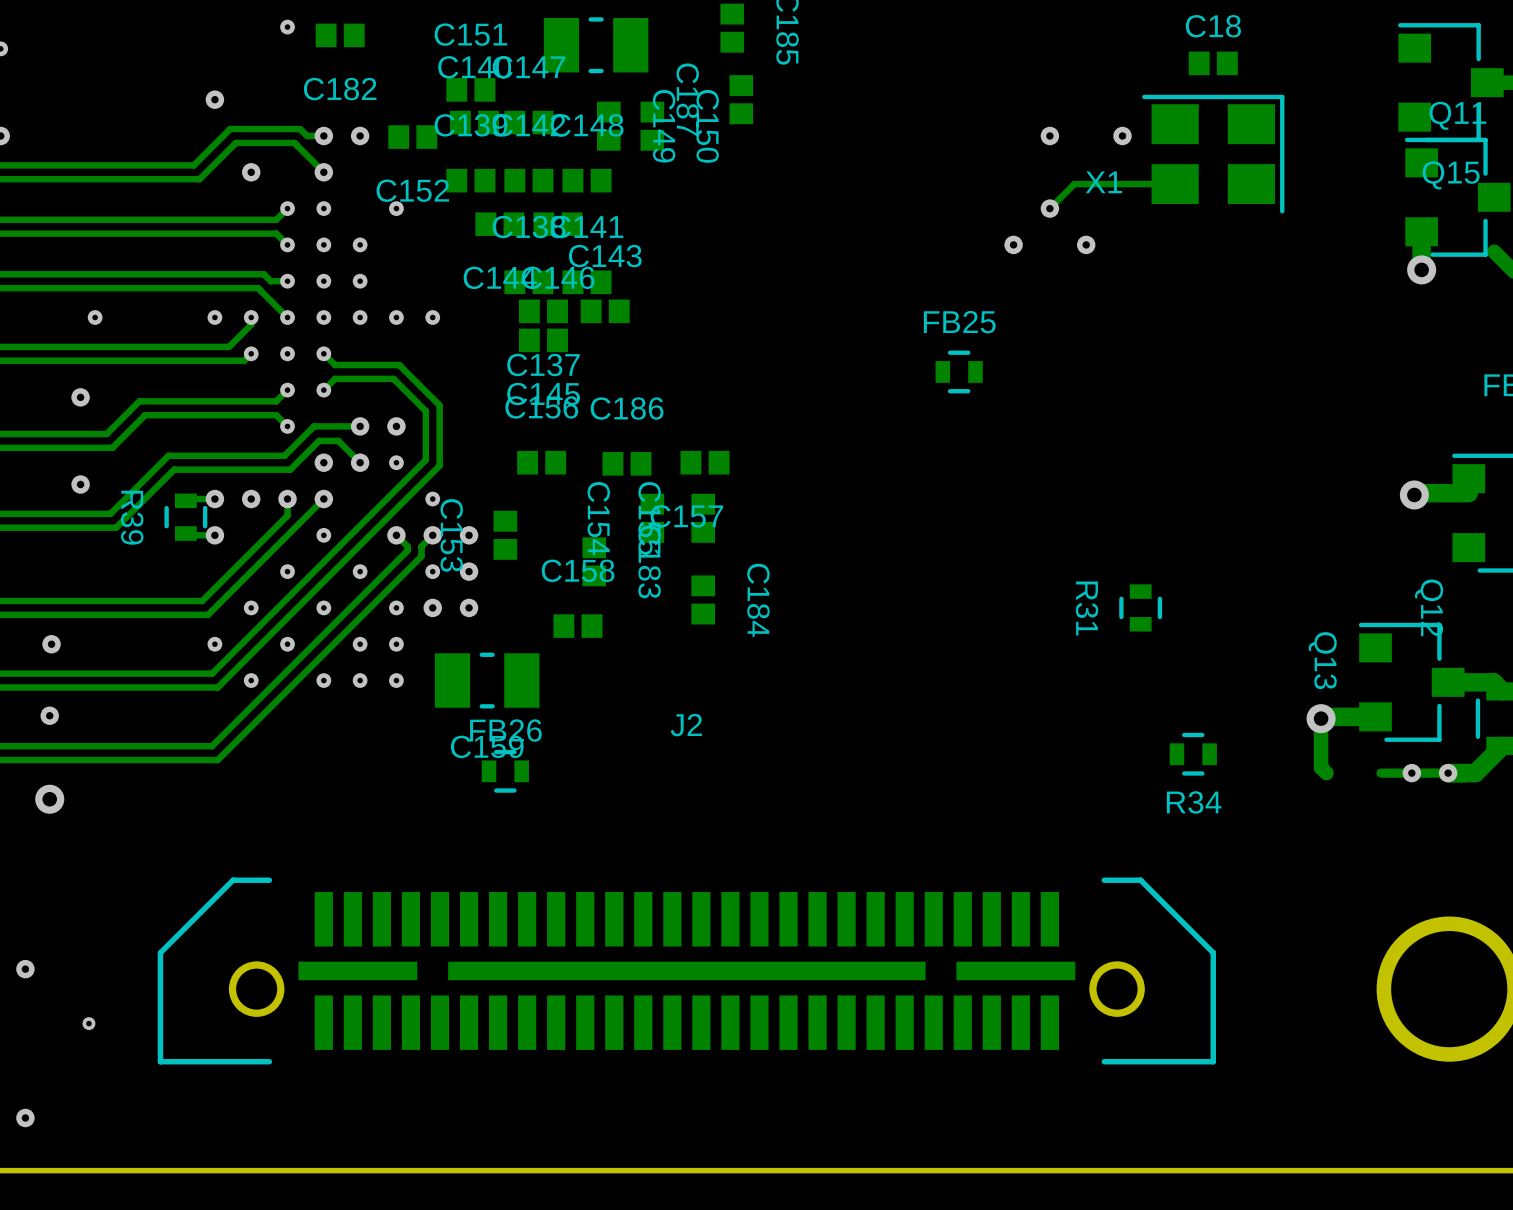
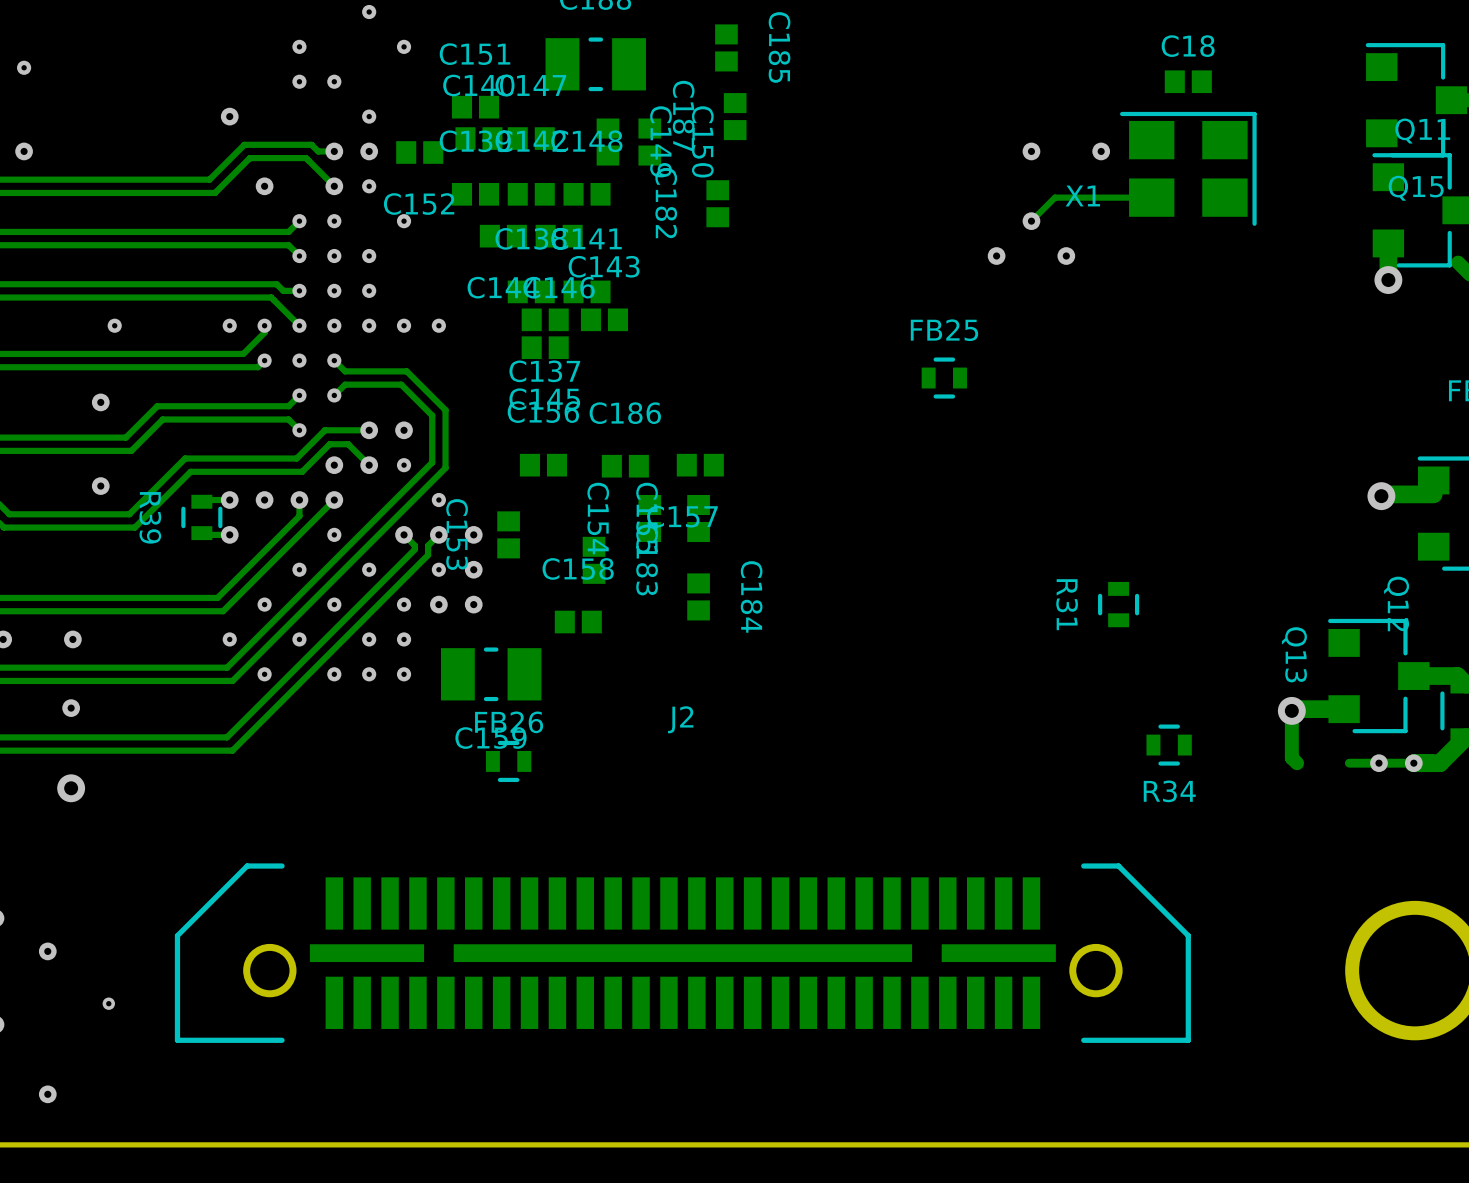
via: none -> (404, 46)
C182 rotation: 0° (340, 35) -> 90° clockwise (717, 203)
C182 position: (340, 35) -> (717, 203)
via: none -> (299, 81)
via: none -> (334, 81)
via: none -> (369, 116)
via: none -> (369, 186)

